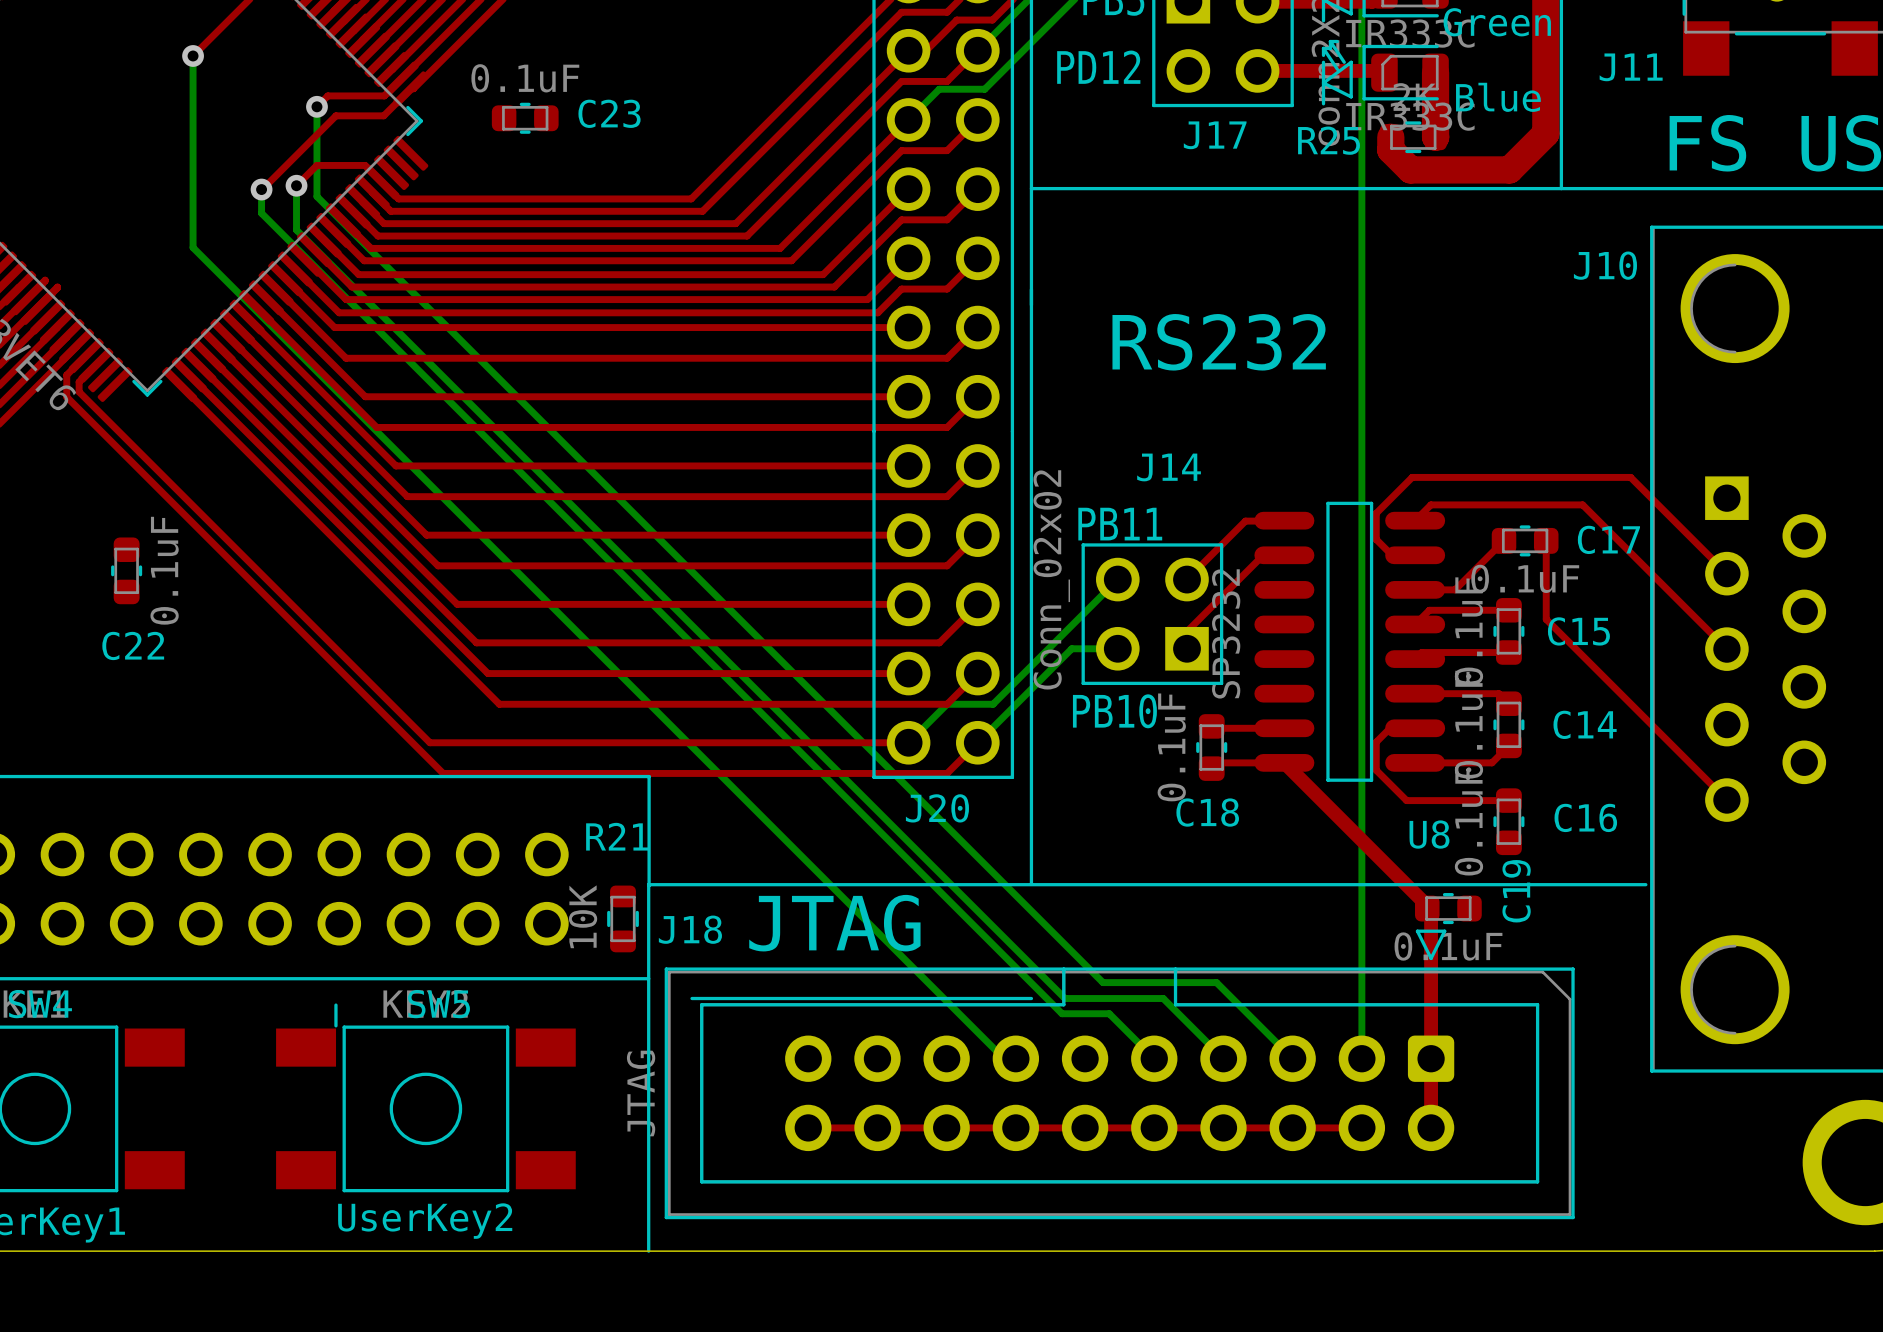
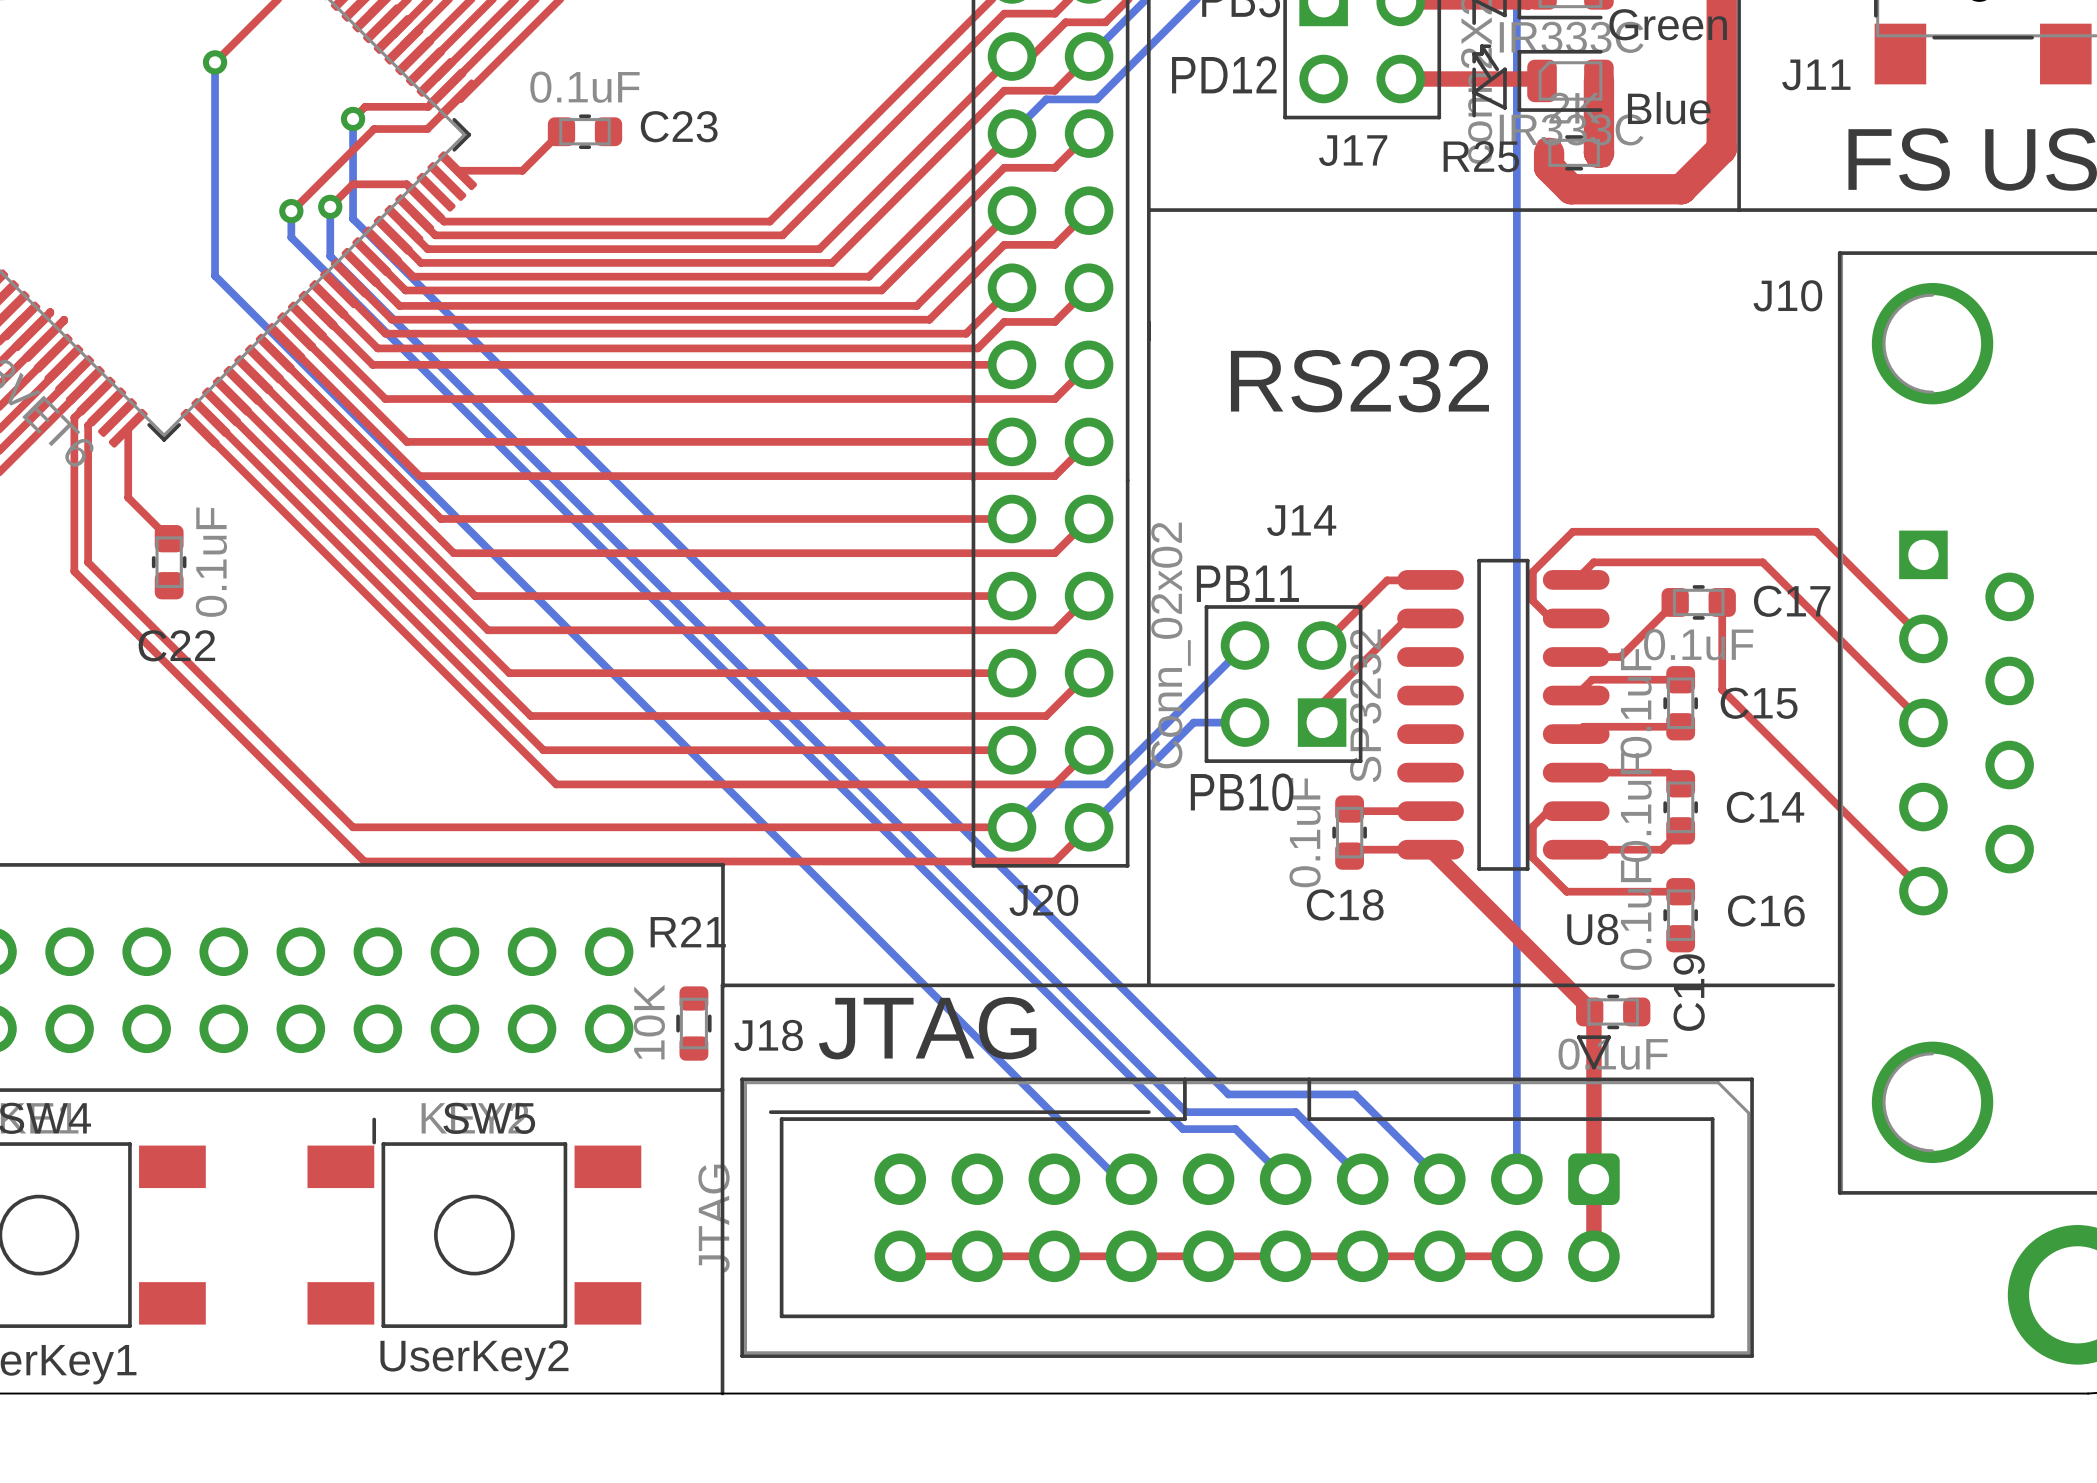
top track: none -> (561, 131) (522, 170) (457, 170)
top track: none -> (128, 428) (128, 497) (169, 538)
top track: (79, 391) (429, 742) -> (88, 436) (88, 562) (352, 827) (478, 827)
top track: (66, 397) (443, 773) -> (74, 442) (74, 571) (364, 861) (493, 861)
C22 position: (126, 570) -> (169, 562)

